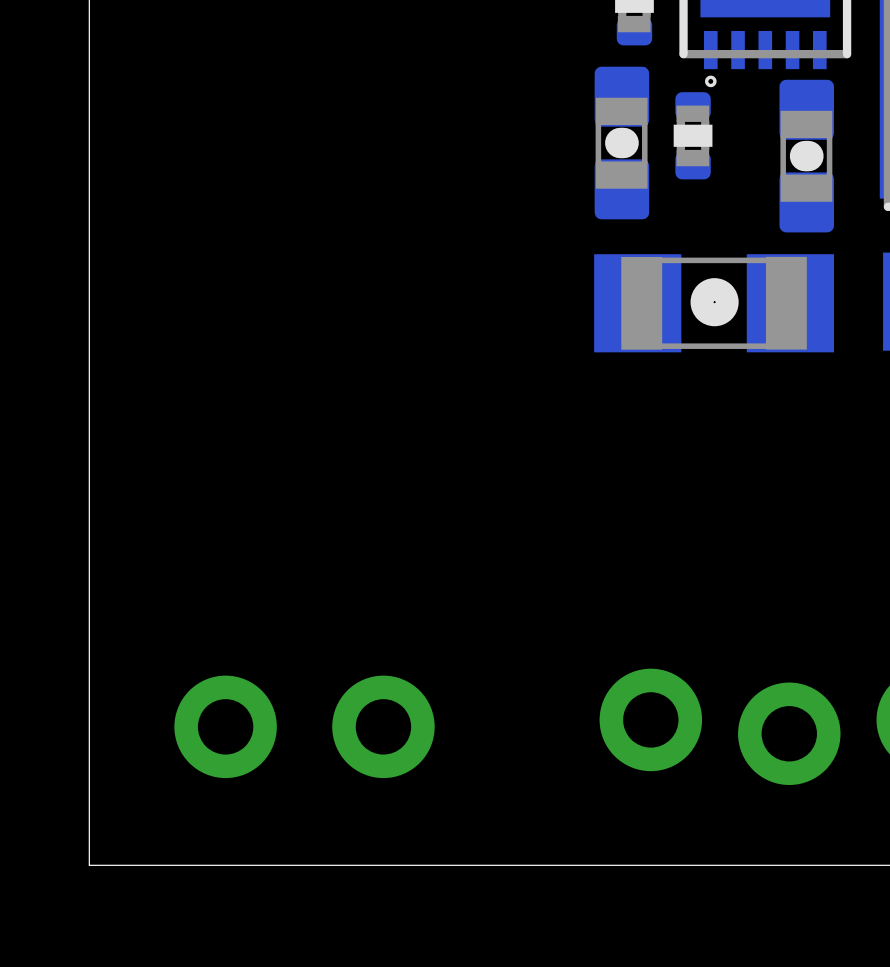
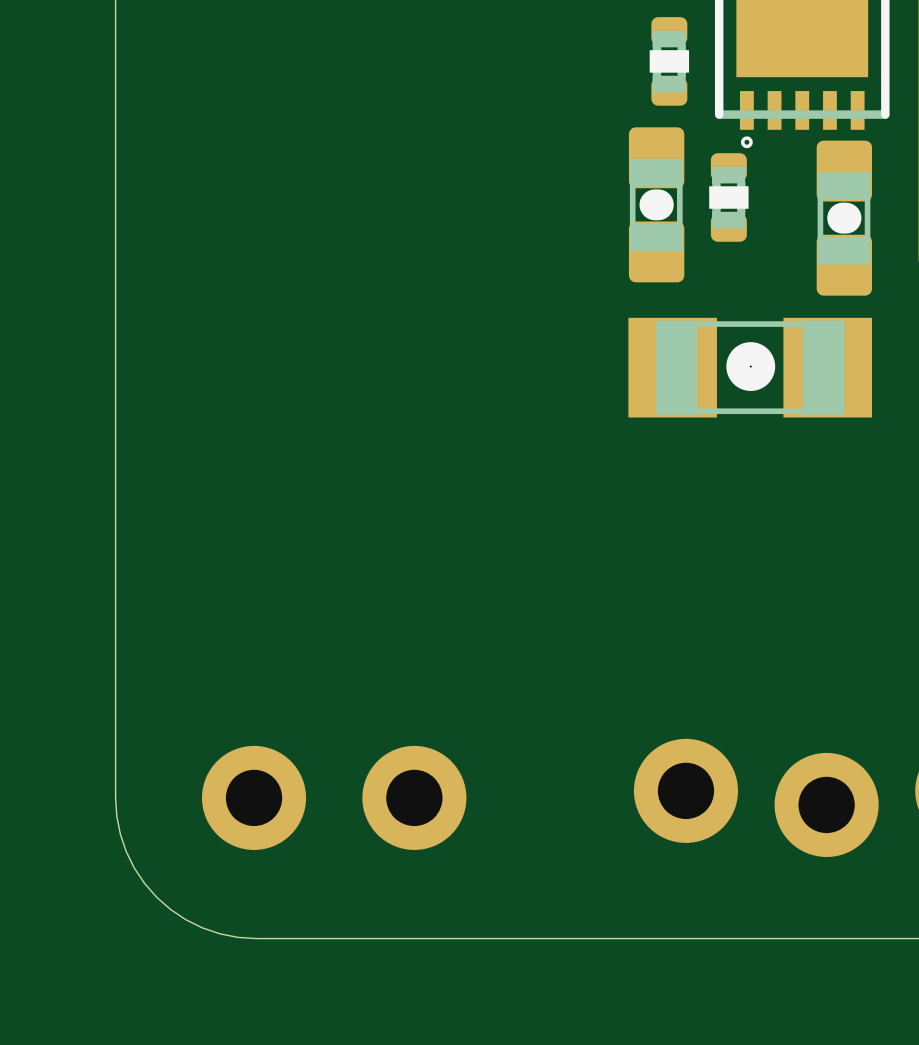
board edge: (89, 726) (89, 865) (227, 865) -> (115, 797) (120, 834) (126, 851) (144, 883) (156, 897) (170, 909) (202, 927) (219, 933) (256, 938)

